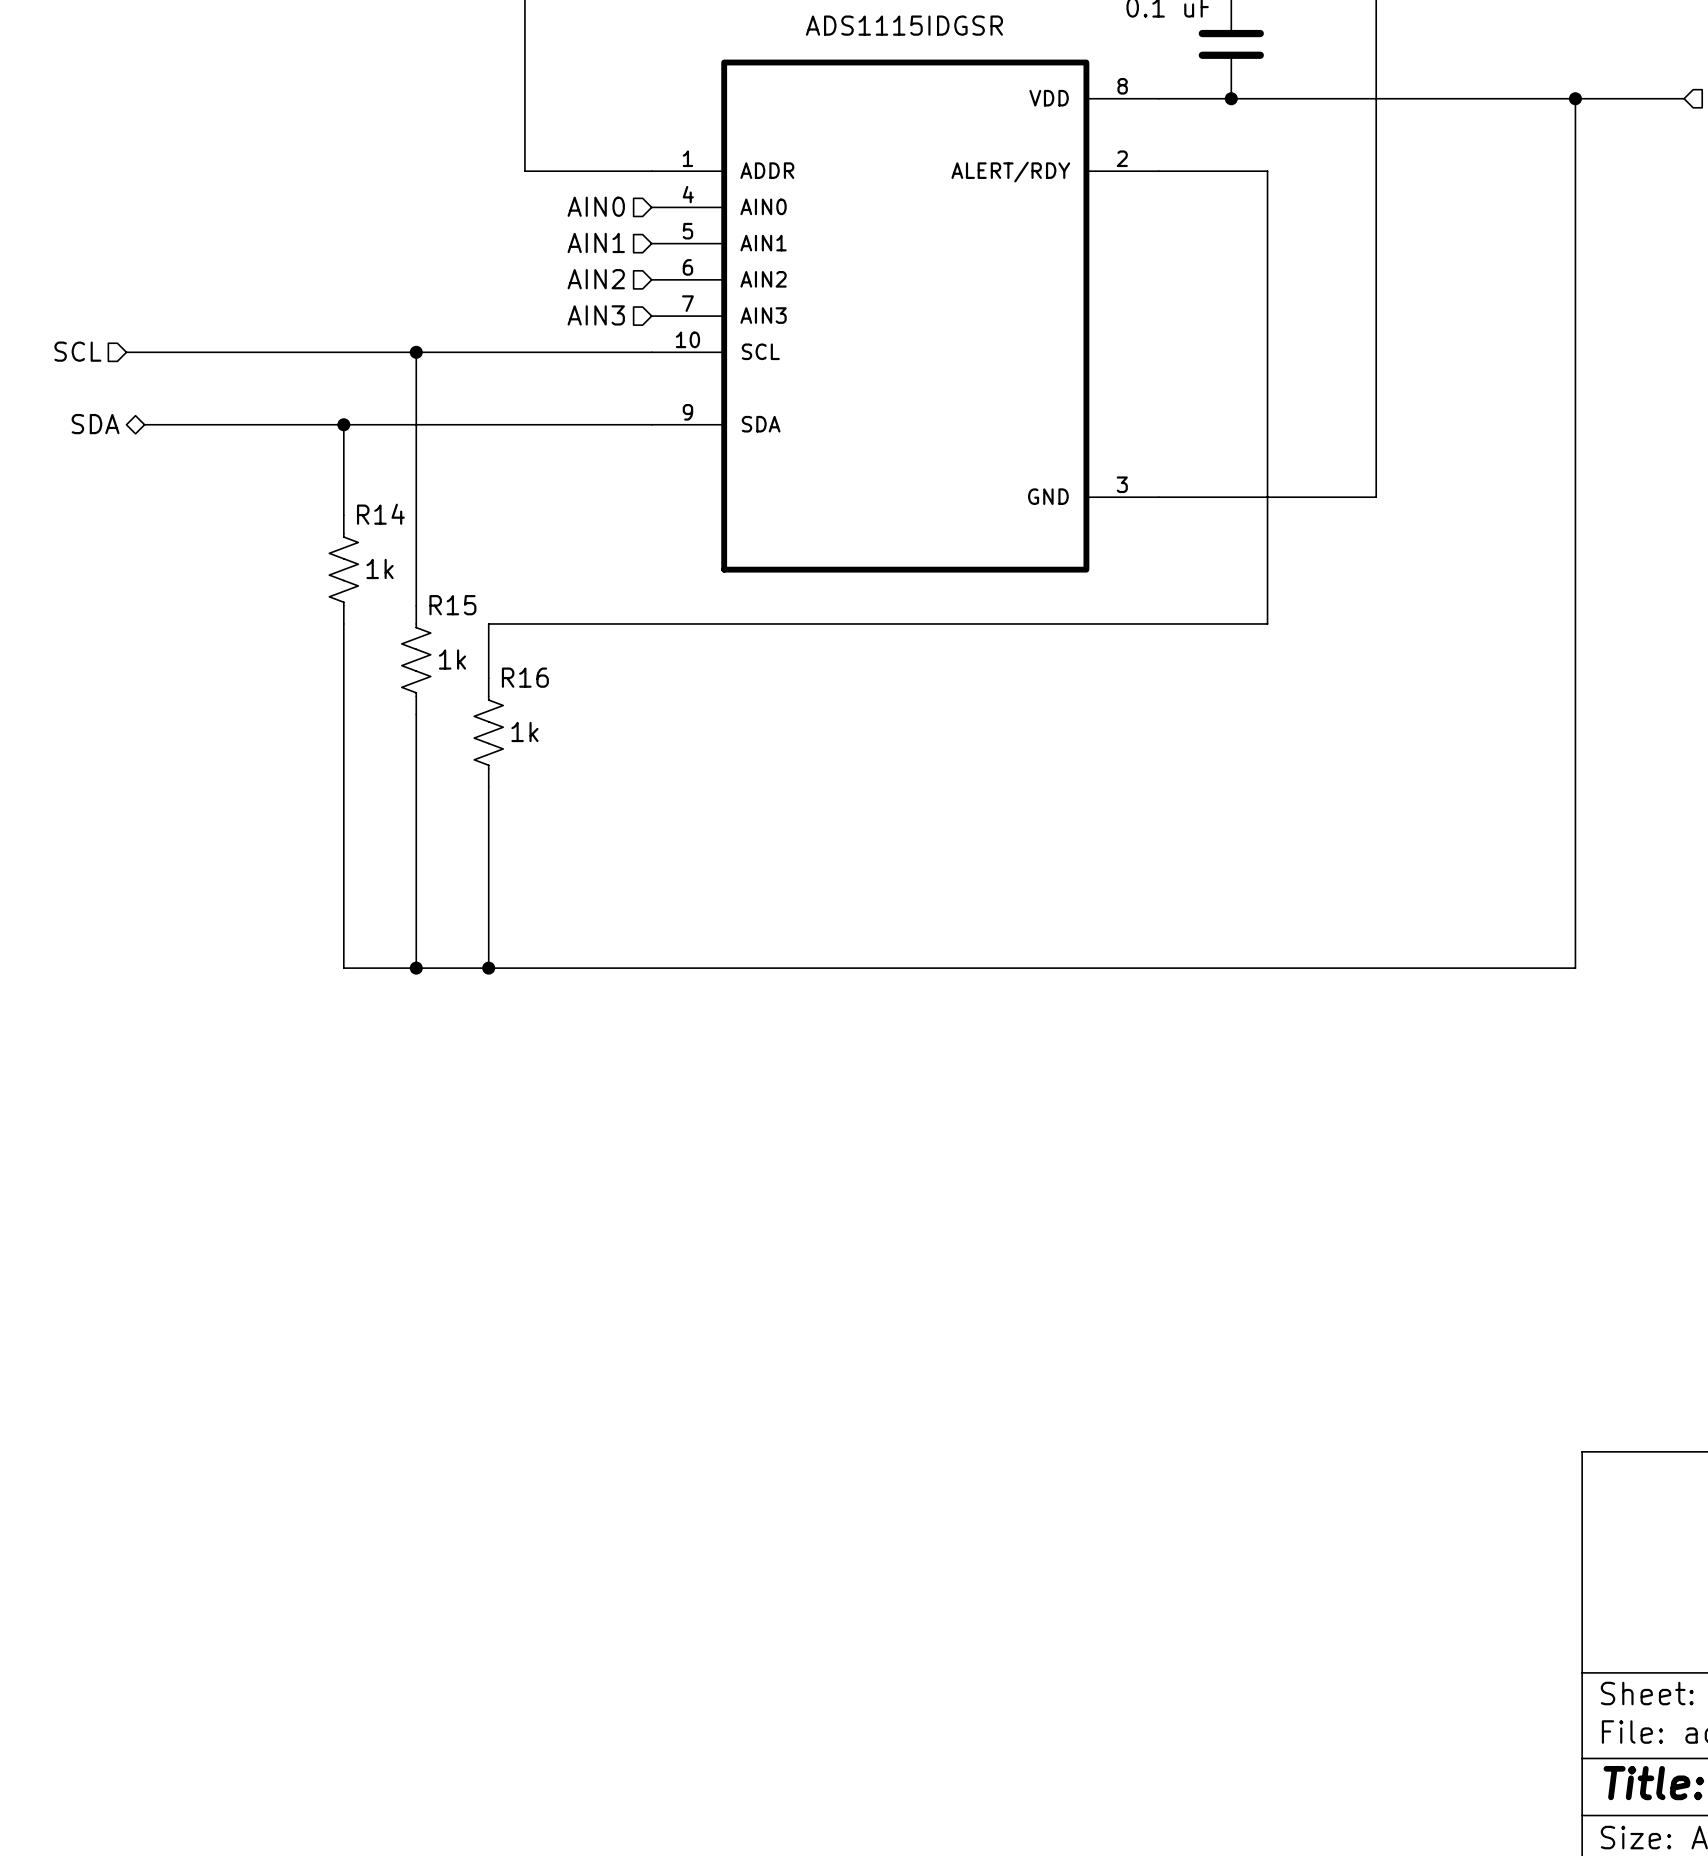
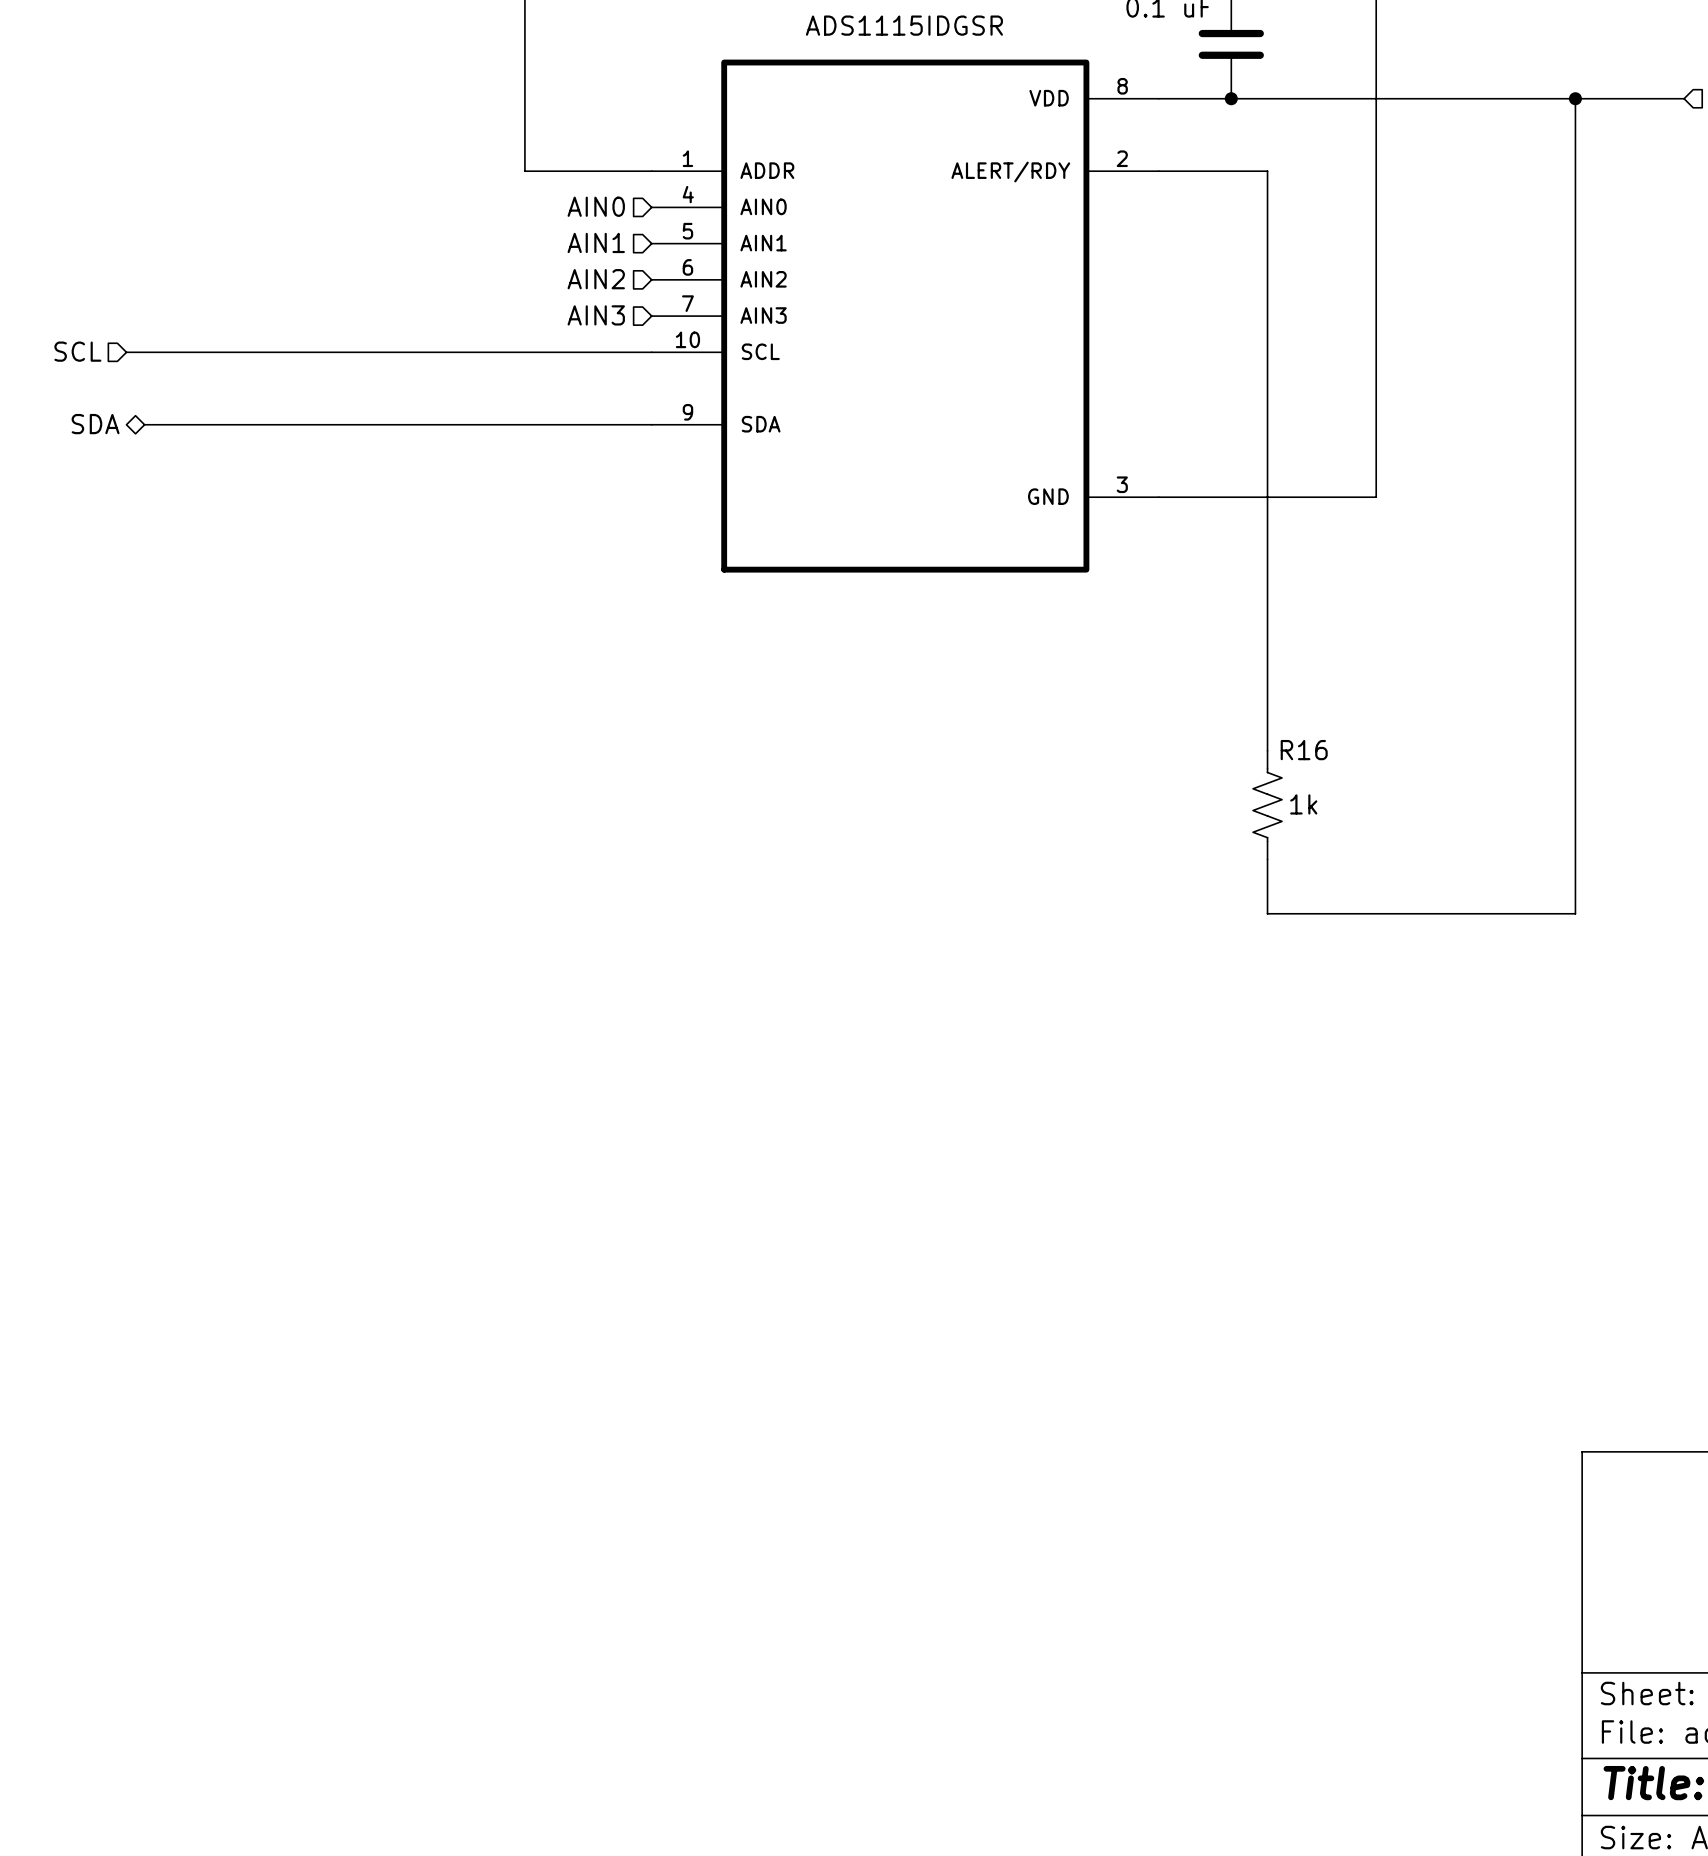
wire: (416, 352) (416, 605) -> none
junction: (416, 352) -> none
wire: (343, 424) (343, 515) -> none
junction: (343, 424) -> none
R14: 1k (343, 569) -> none
wire: (343, 623) (343, 968) (1575, 968) (1575, 913) -> (1267, 859) (1267, 913) (1575, 913)
wire: (1267, 623) (488, 623) (488, 678) -> (1267, 623) (1267, 750)
R15: 1k (416, 660) -> none
wire: (416, 714) (416, 968) -> none
R16 position: (488, 732) -> (1267, 805)
wire: (488, 786) (488, 968) -> none
junction: (416, 968) -> none
junction: (488, 968) -> none

